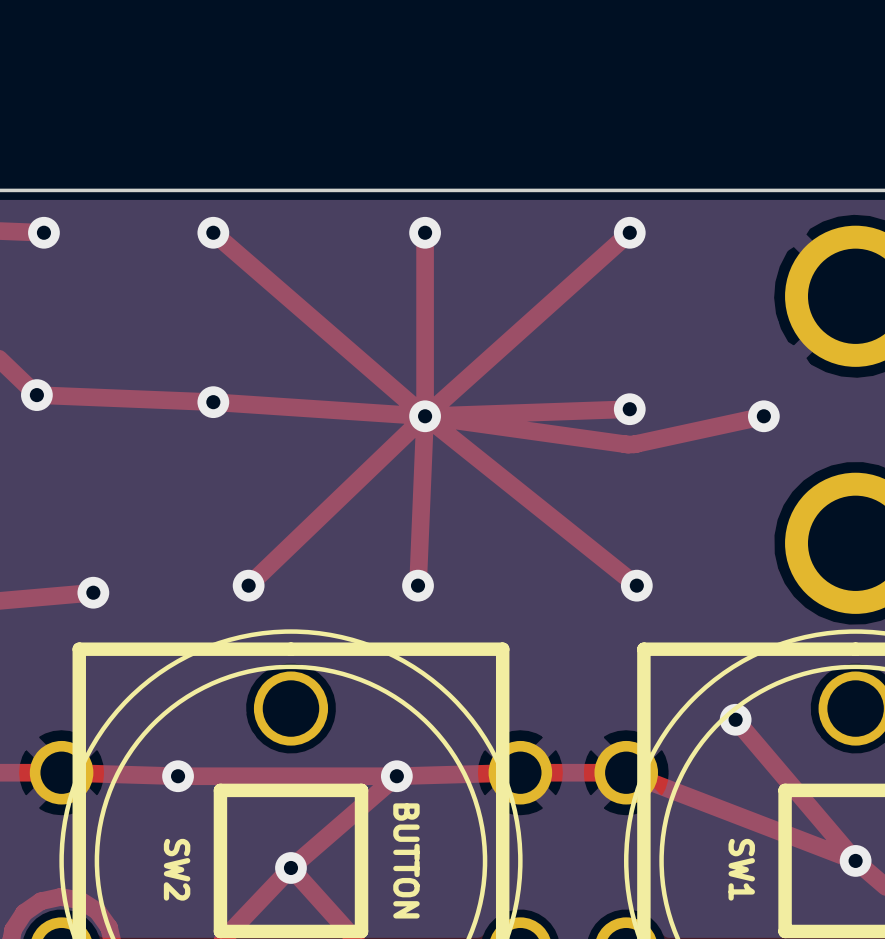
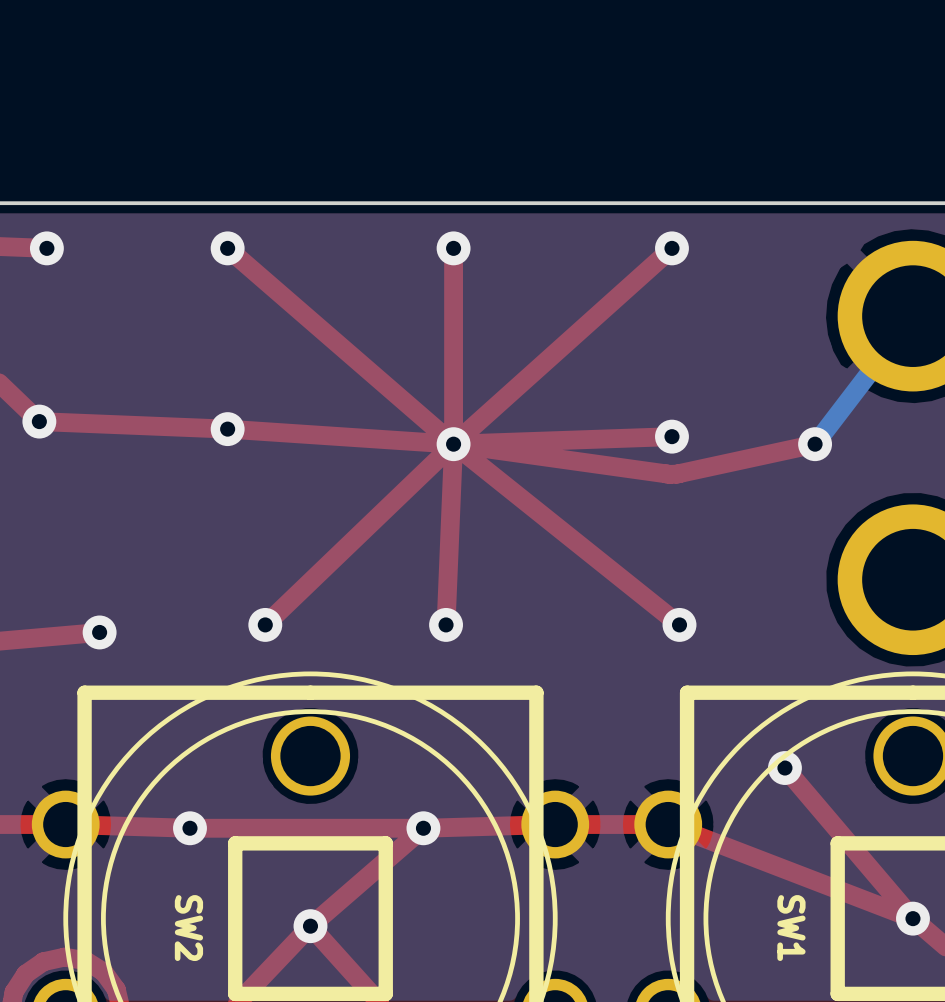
bottom track: none -> (912, 316) (815, 444)
SW2 value: BUTTON (406, 860) -> none

